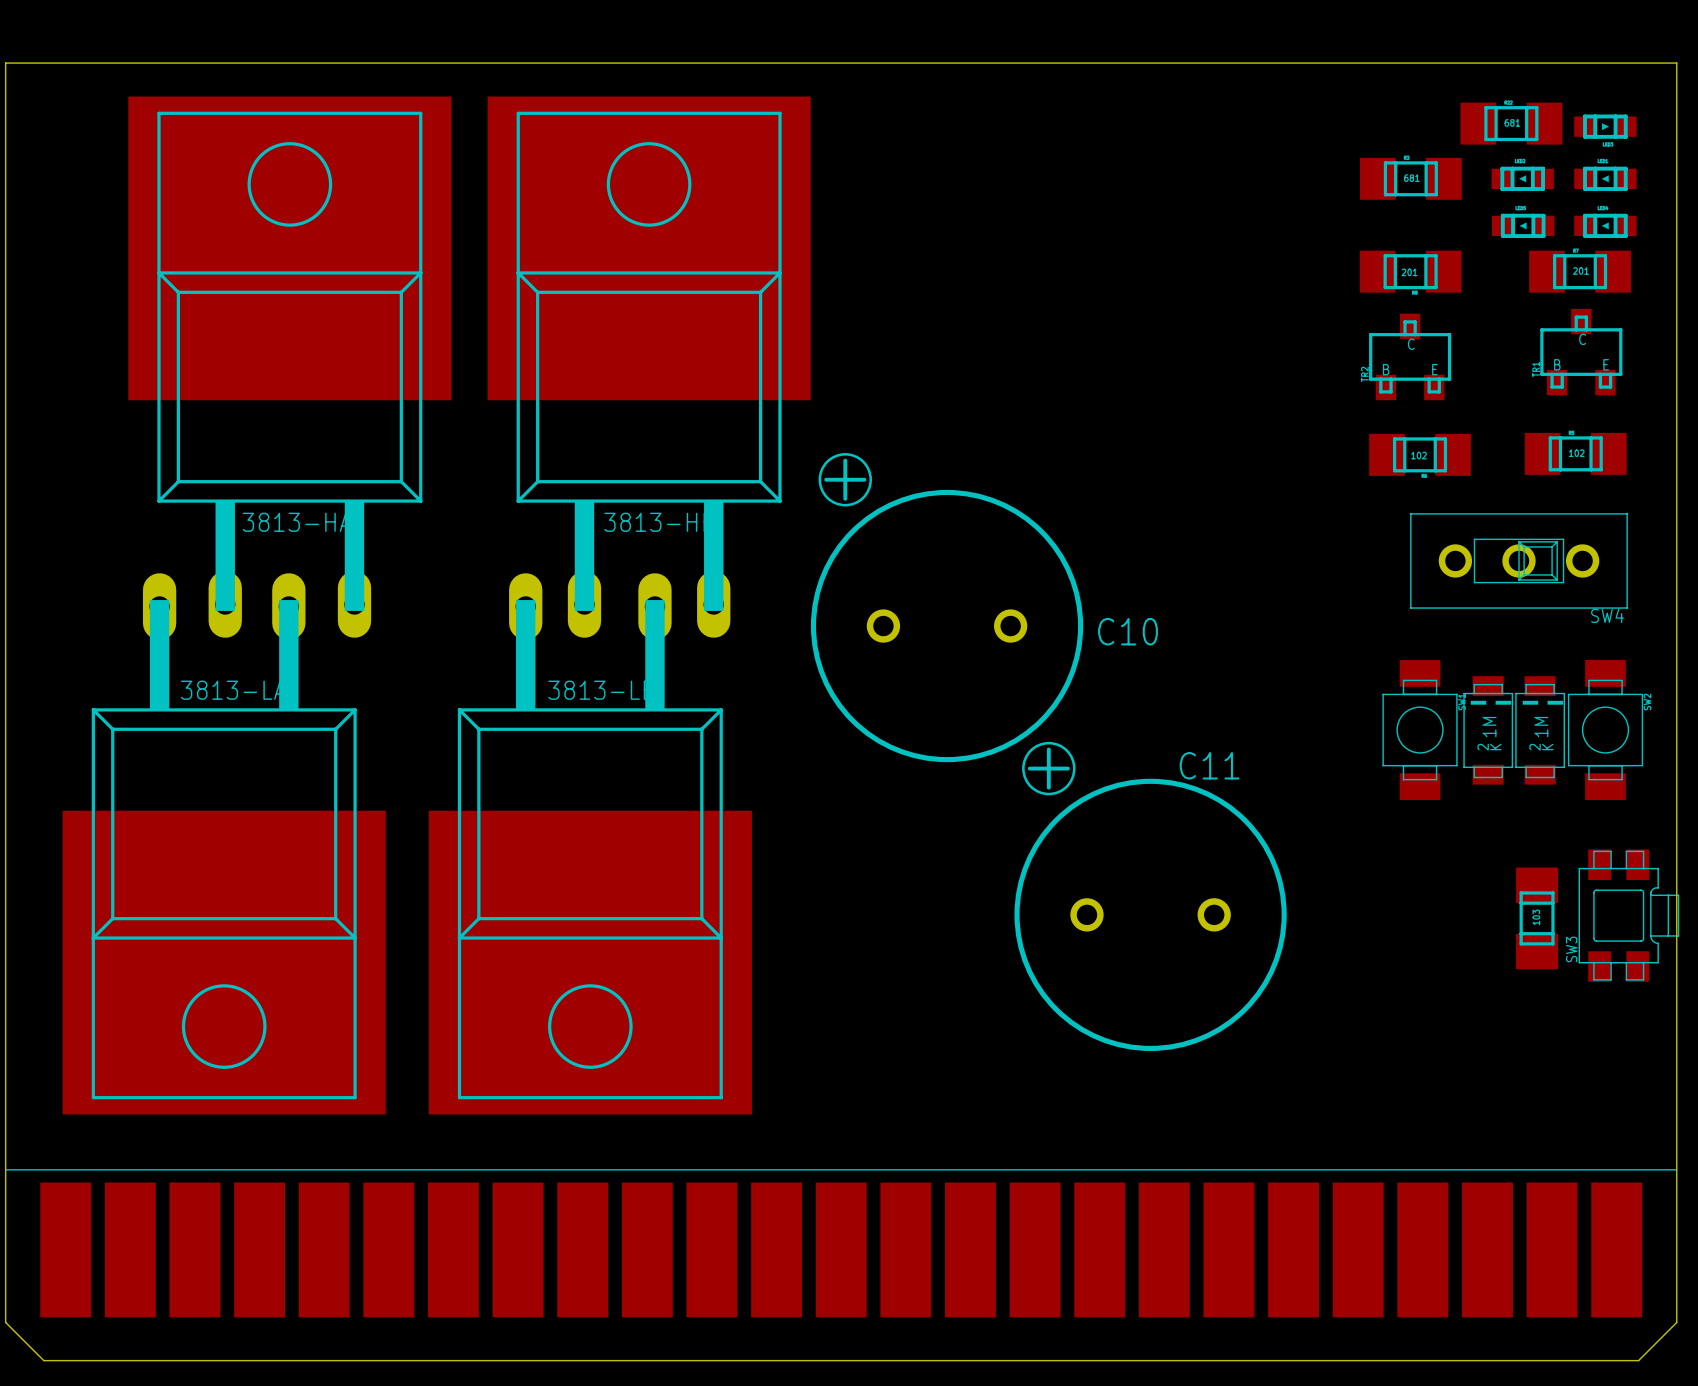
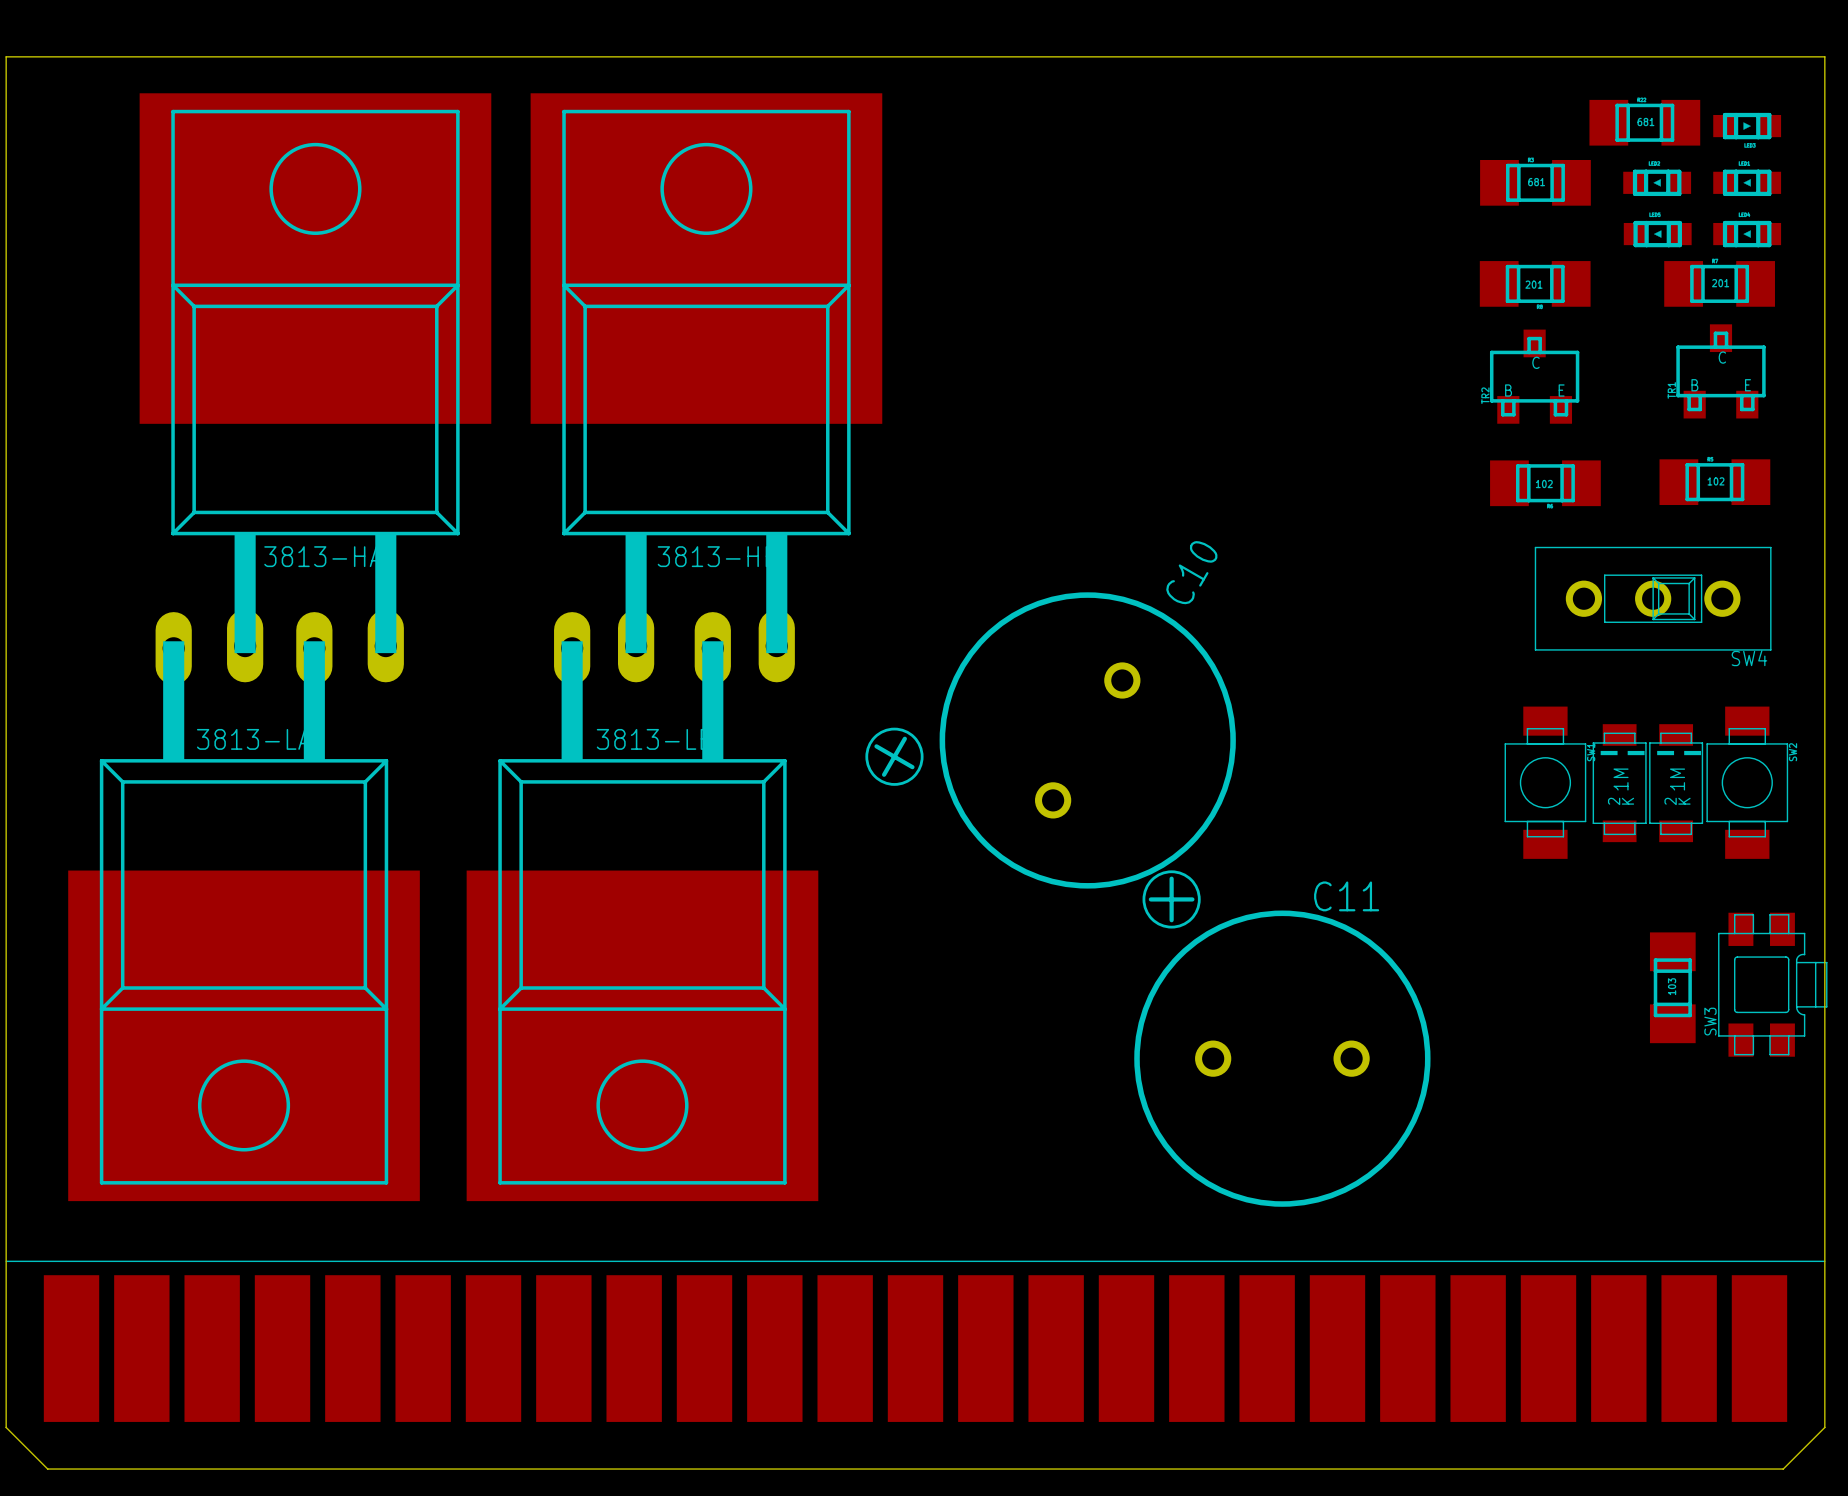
C10 rotation: 0° (947, 607) -> 60° counterclockwise (1050, 740)
C11 position: (1150, 896) -> (1282, 1038)

